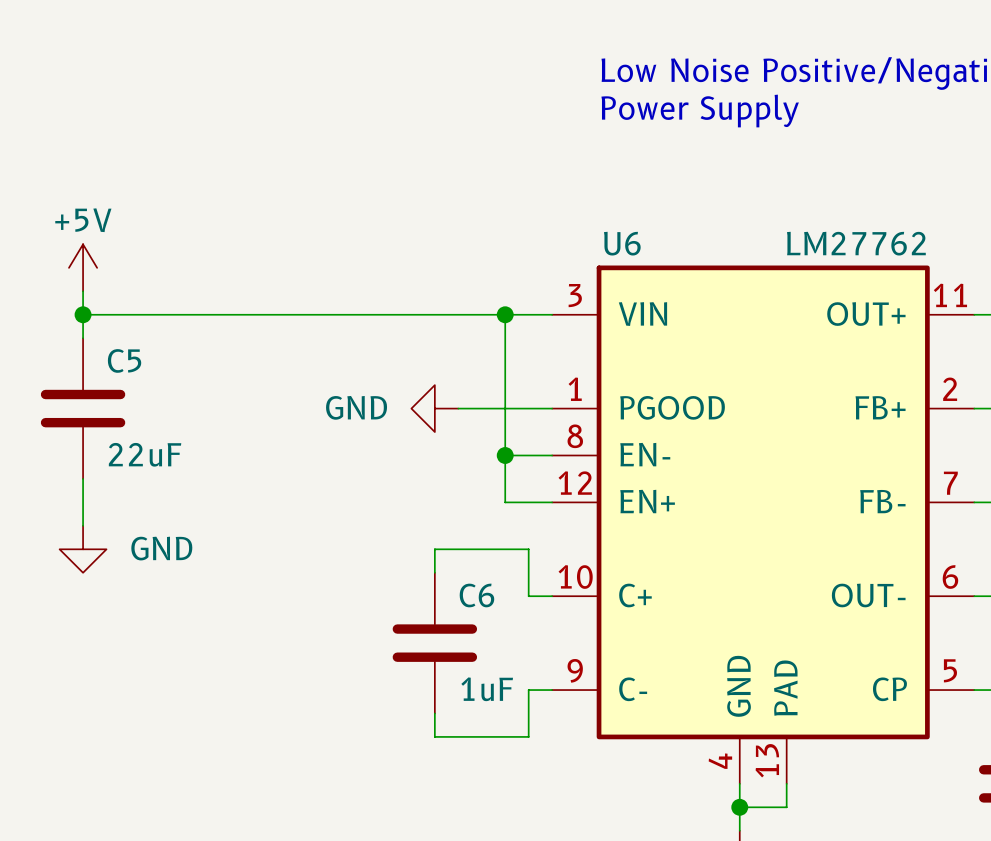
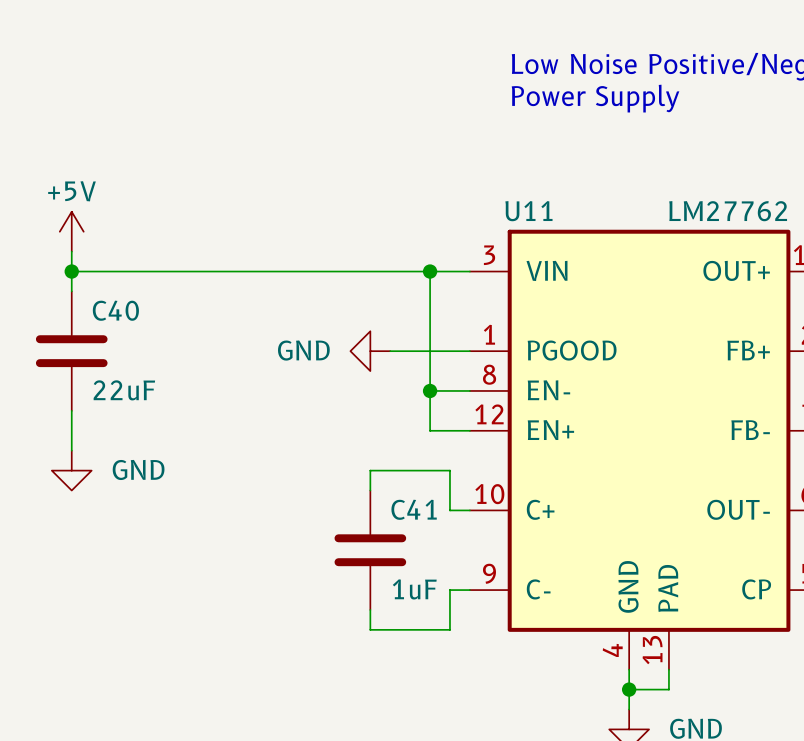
U6 name: U6 (622, 243) -> U11 (528, 211)
C5 name: C5 (124, 360) -> C40 (115, 310)
C6 name: C6 (476, 595) -> C41 (414, 509)

